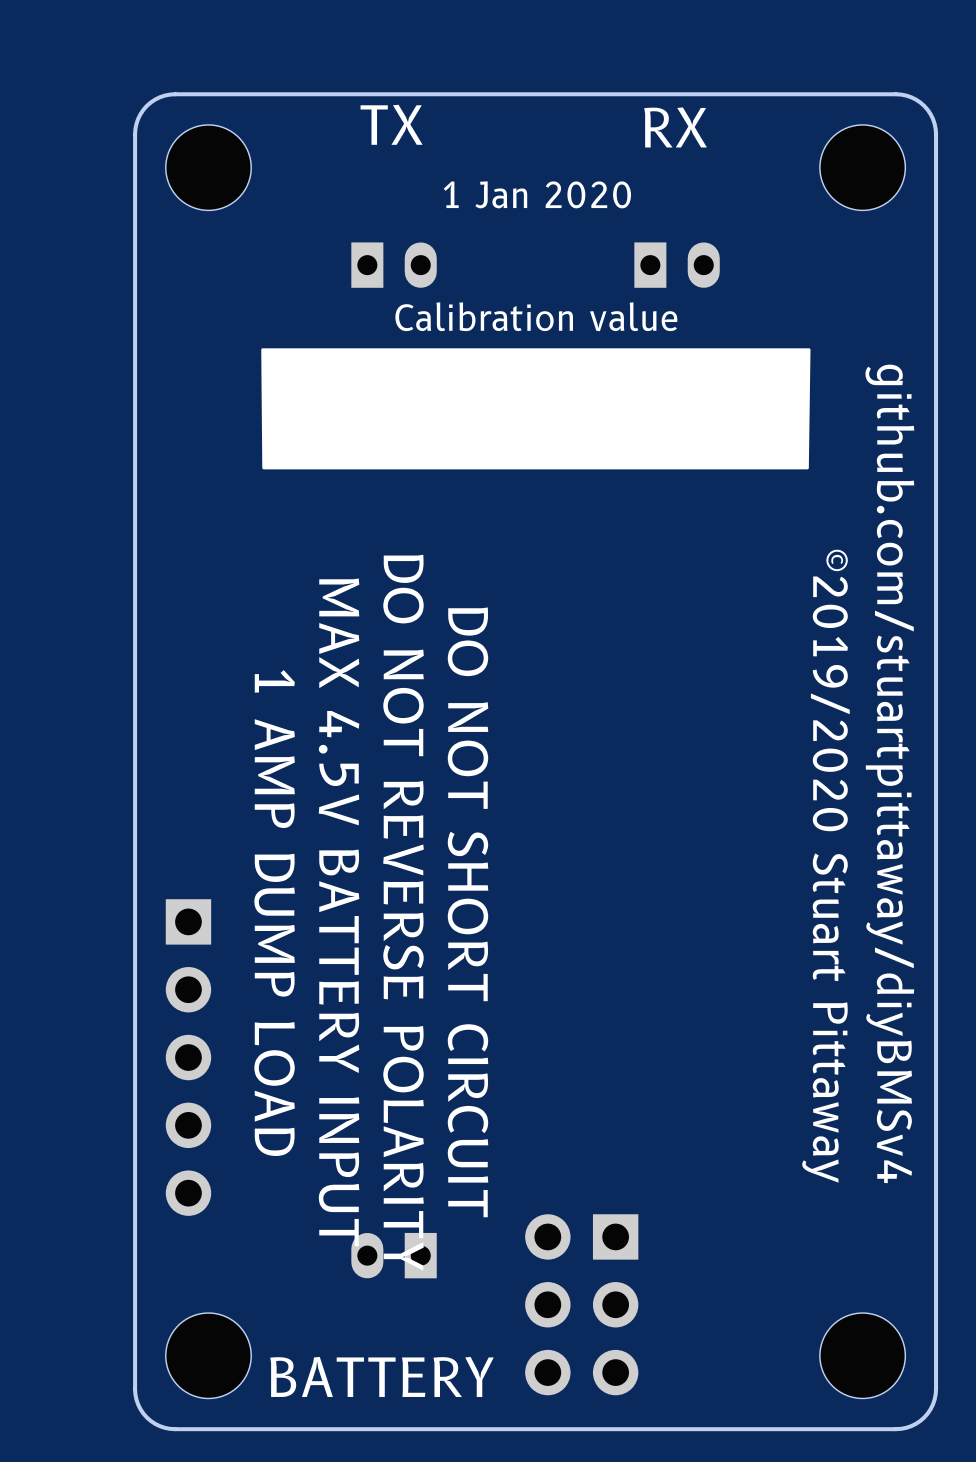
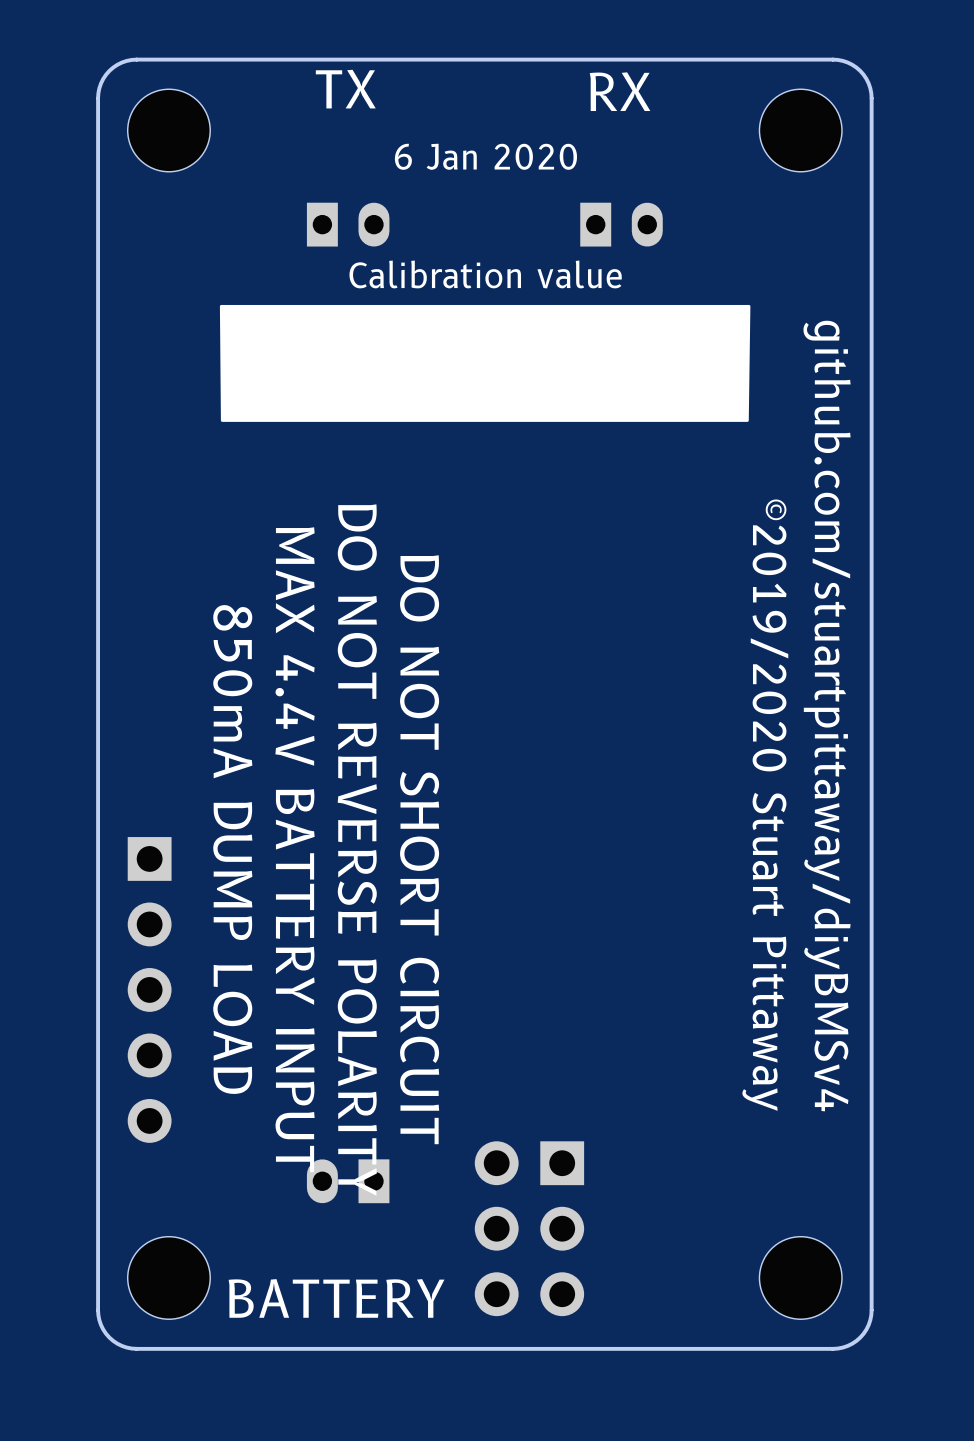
text: 1 Jan 2020 (537, 194) -> 6 Jan 2020 (485, 156)
text: MAX 4.5V BATTERY INPUT (339, 912) -> MAX 4.4V BATTERY INPUT (295, 849)
text: 1 AMP DUMP LOAD (274, 913) -> 850mA DUMP LOAD (232, 849)

